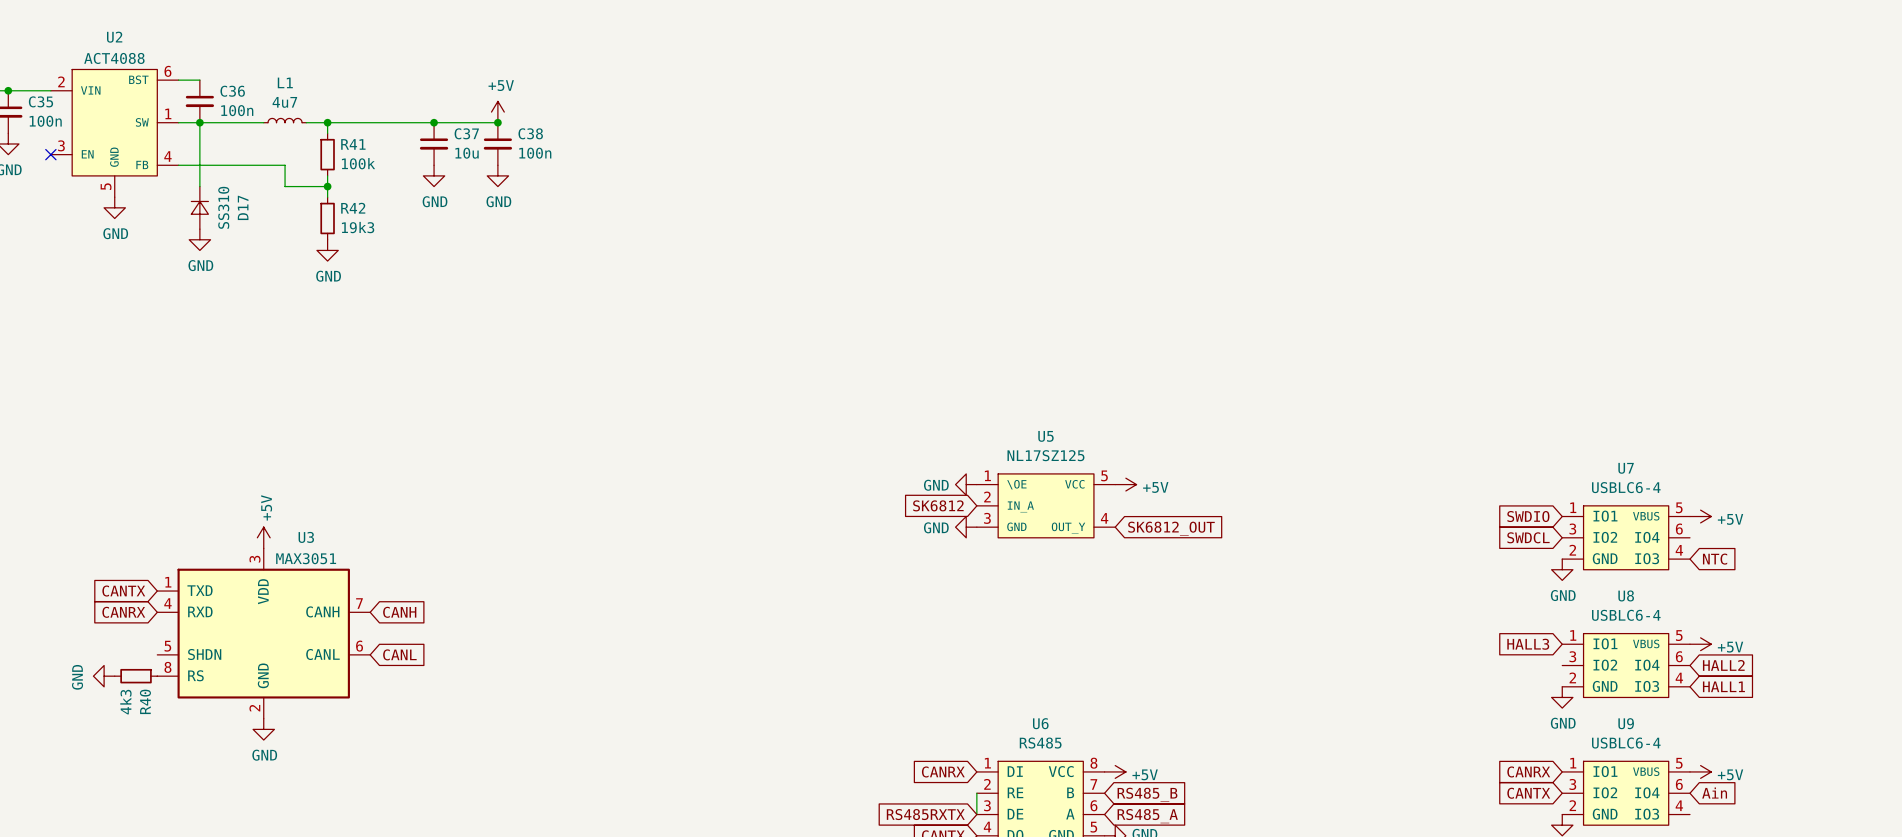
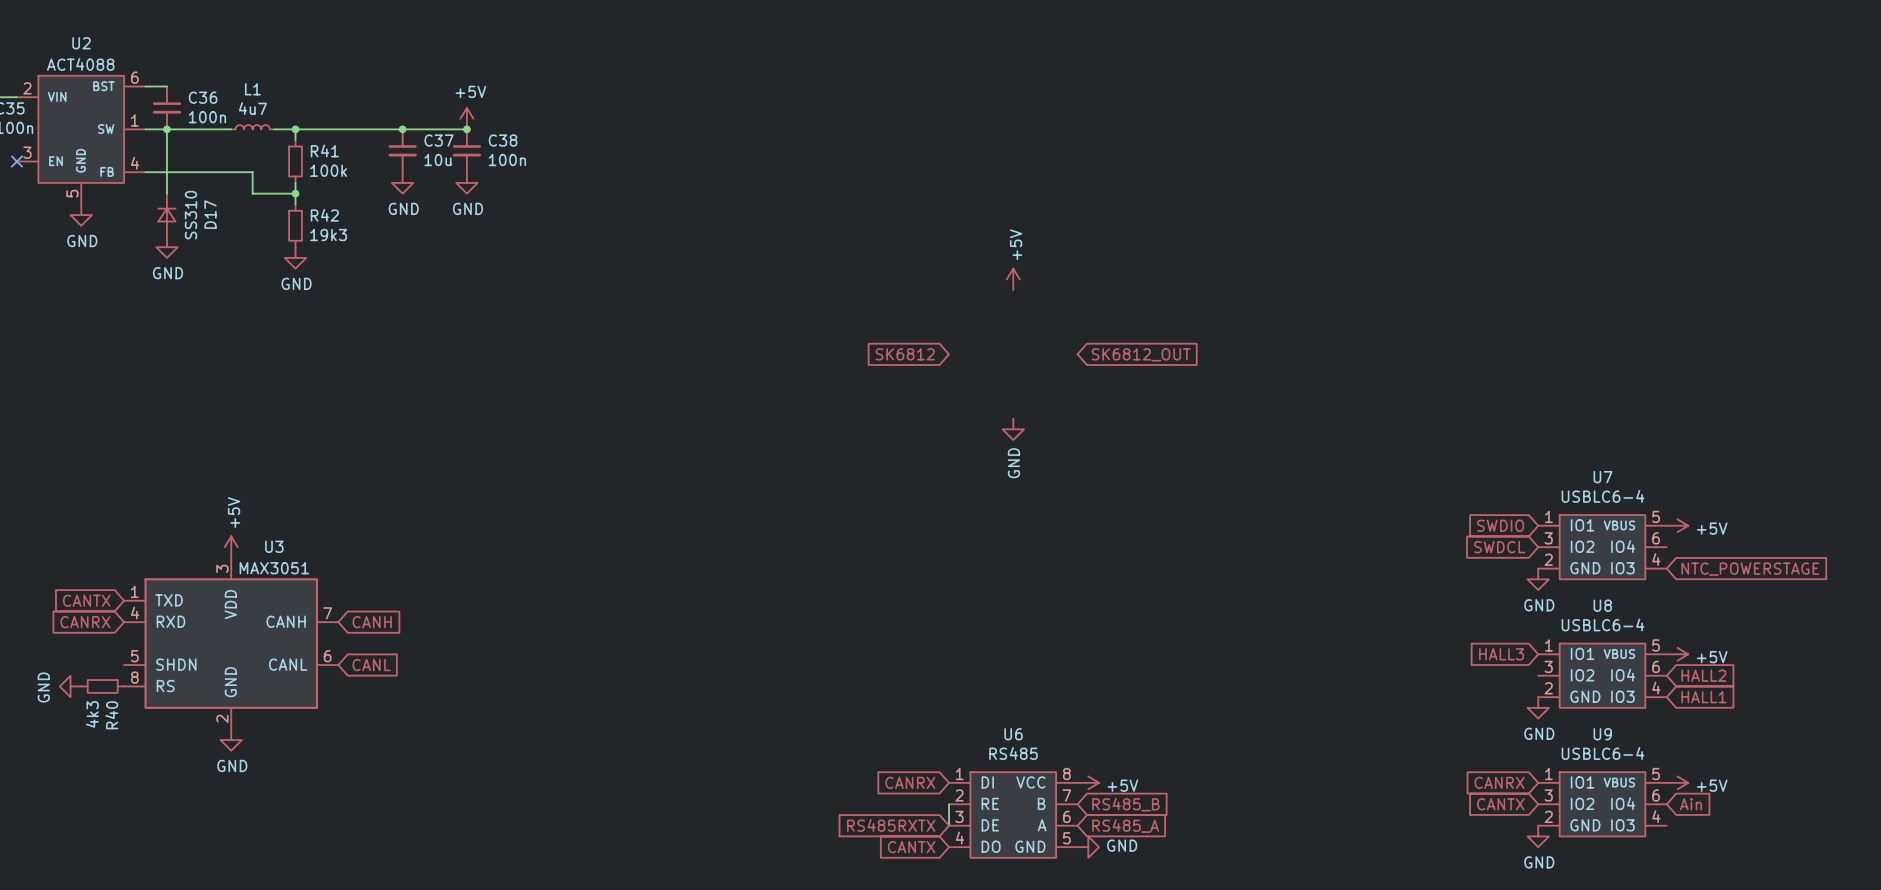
power symbol: none -> +5V (1013, 279)
power symbol: none -> GND (1013, 429)
power symbol: GND (966, 484) -> none
power symbol: +5V (1125, 484) -> none
global label position: SK6812 (938, 505) -> SK6812 (905, 354)
U5: NL17SZ125 (1046, 505) -> none
power symbol: GND (966, 527) -> none
global label position: SK6812_OUT (1171, 528) -> SK6812_OUT (1141, 354)
global label: NTC (1715, 559) -> NTC_POWERSTAGE (1750, 569)

